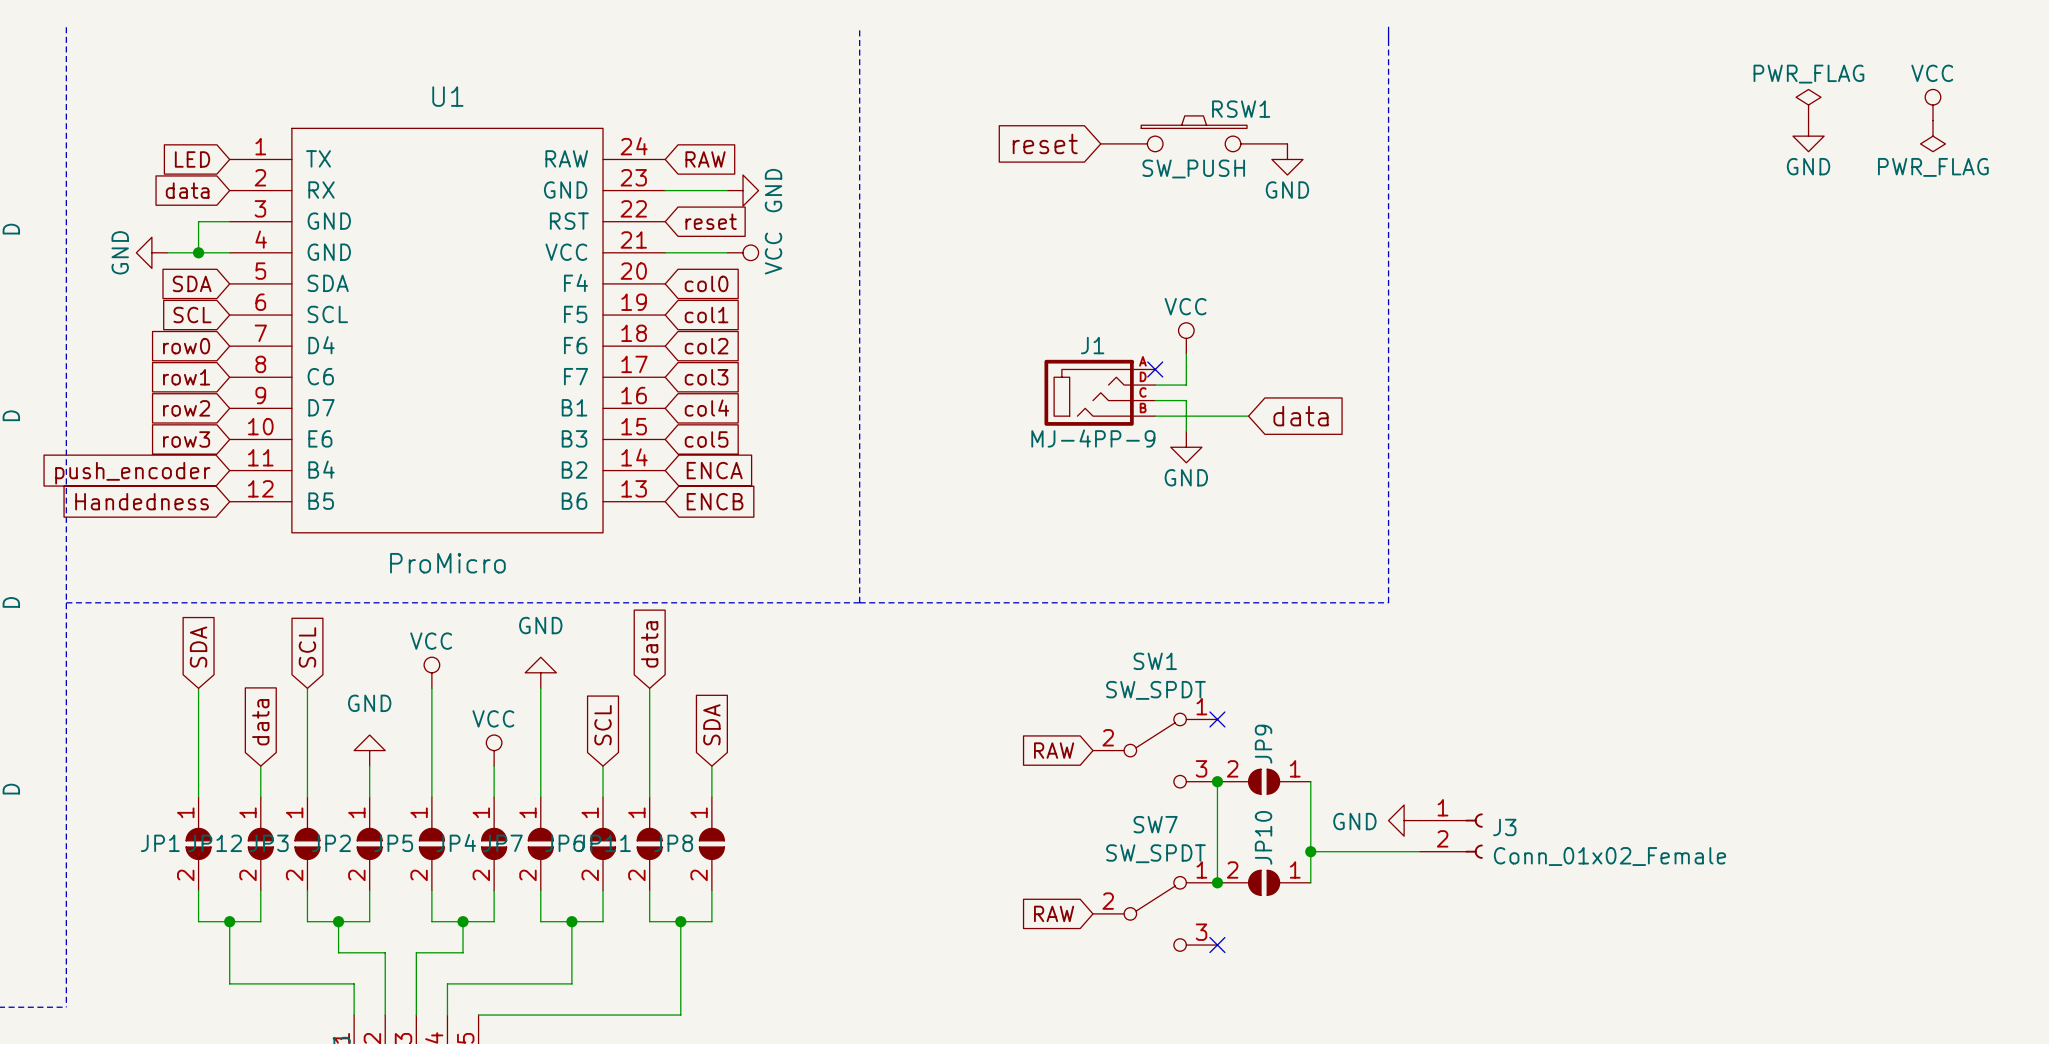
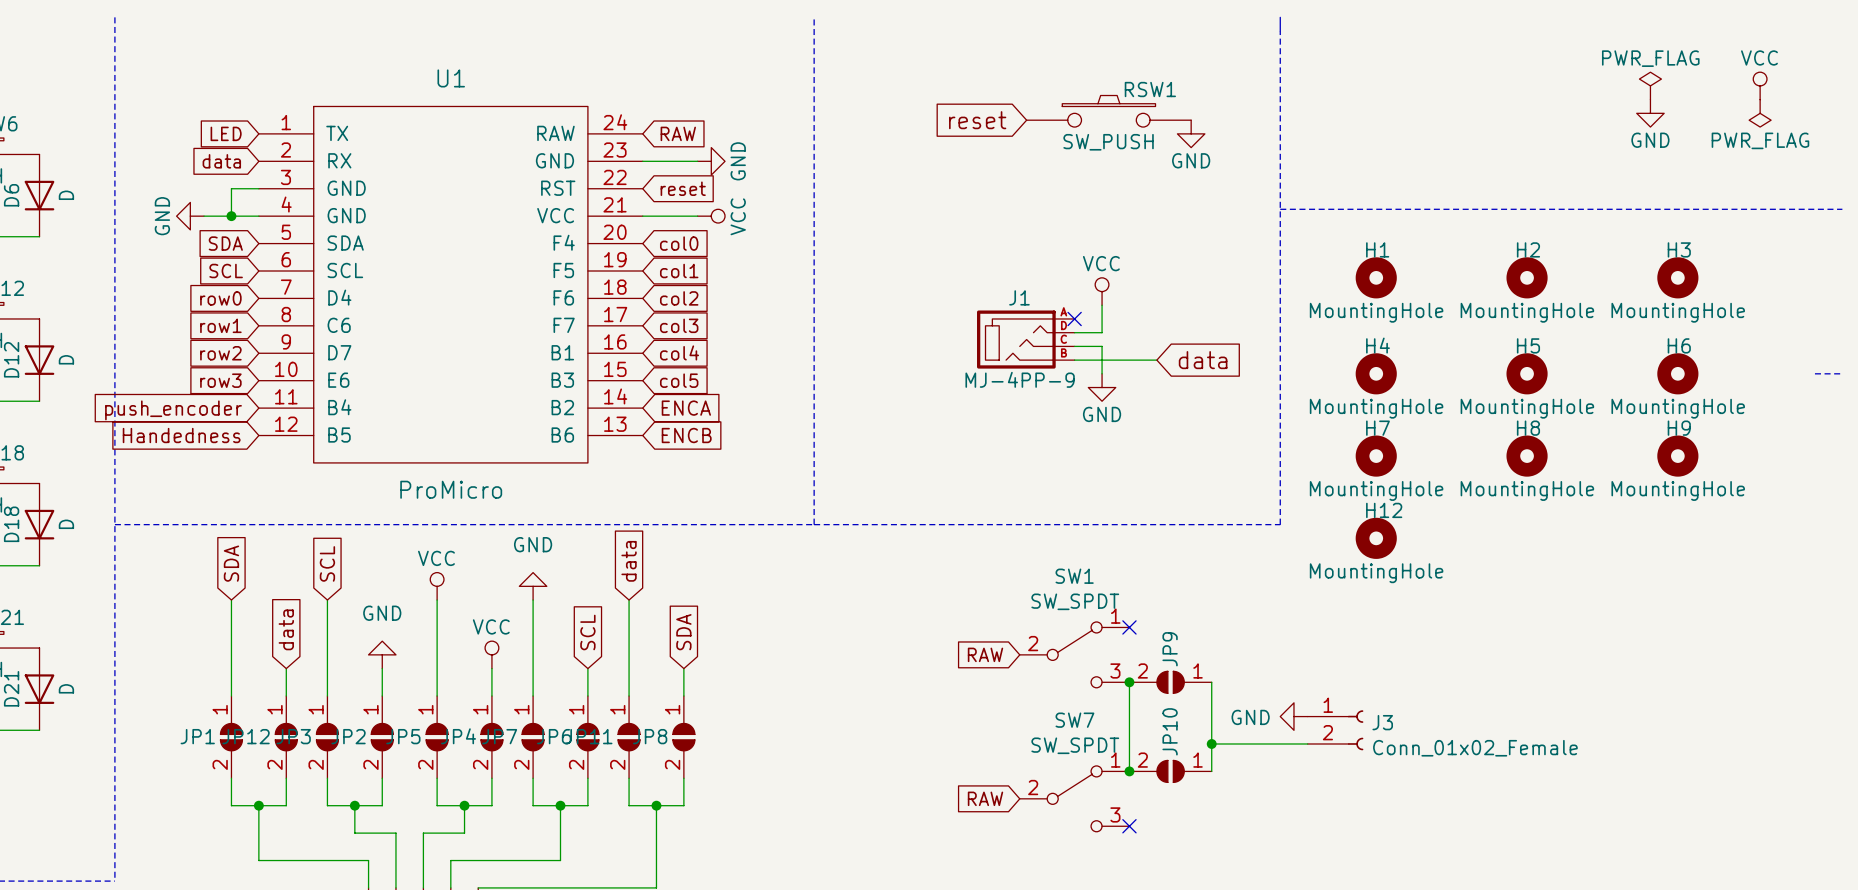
line: none -> (1280, 209) (1842, 209)
H1: none -> MountingHole (1376, 277)
H2: none -> MountingHole (1527, 277)
H3: none -> MountingHole (1677, 277)
H4: none -> MountingHole (1376, 373)
H5: none -> MountingHole (1527, 373)
H6: none -> MountingHole (1677, 373)
line: none -> (1814, 373) (1842, 373)
H7: none -> MountingHole (1376, 456)
H8: none -> MountingHole (1527, 456)
H9: none -> MountingHole (1677, 456)
H12: none -> MountingHole (1376, 538)

